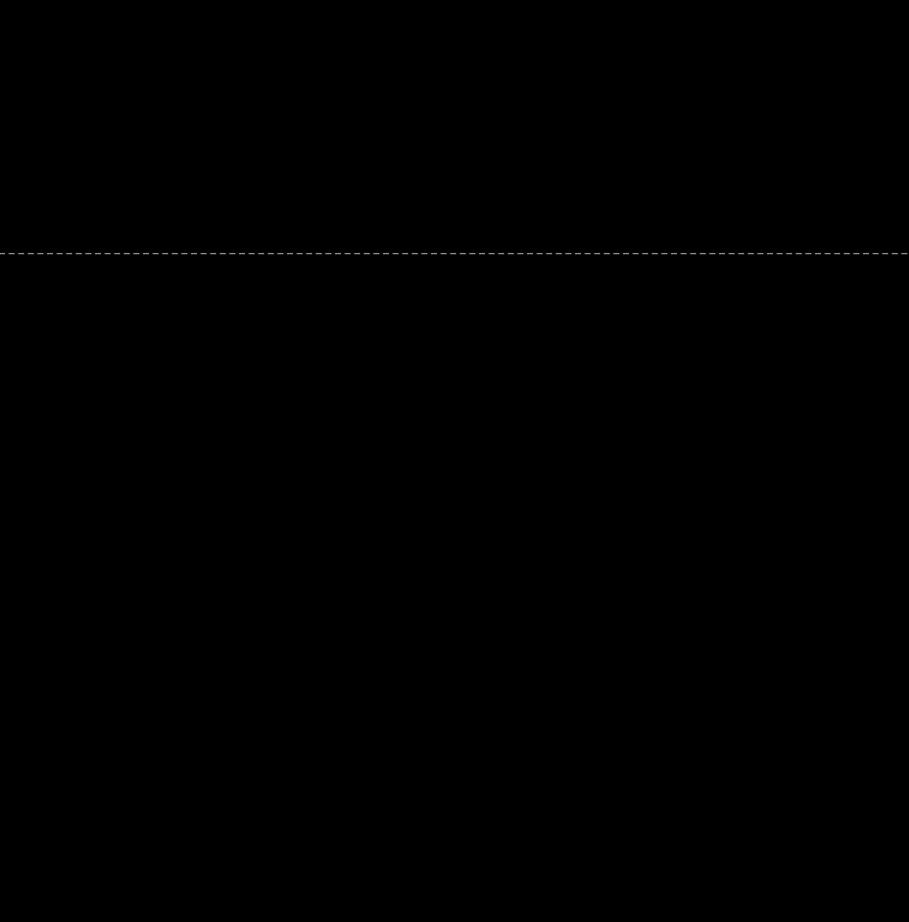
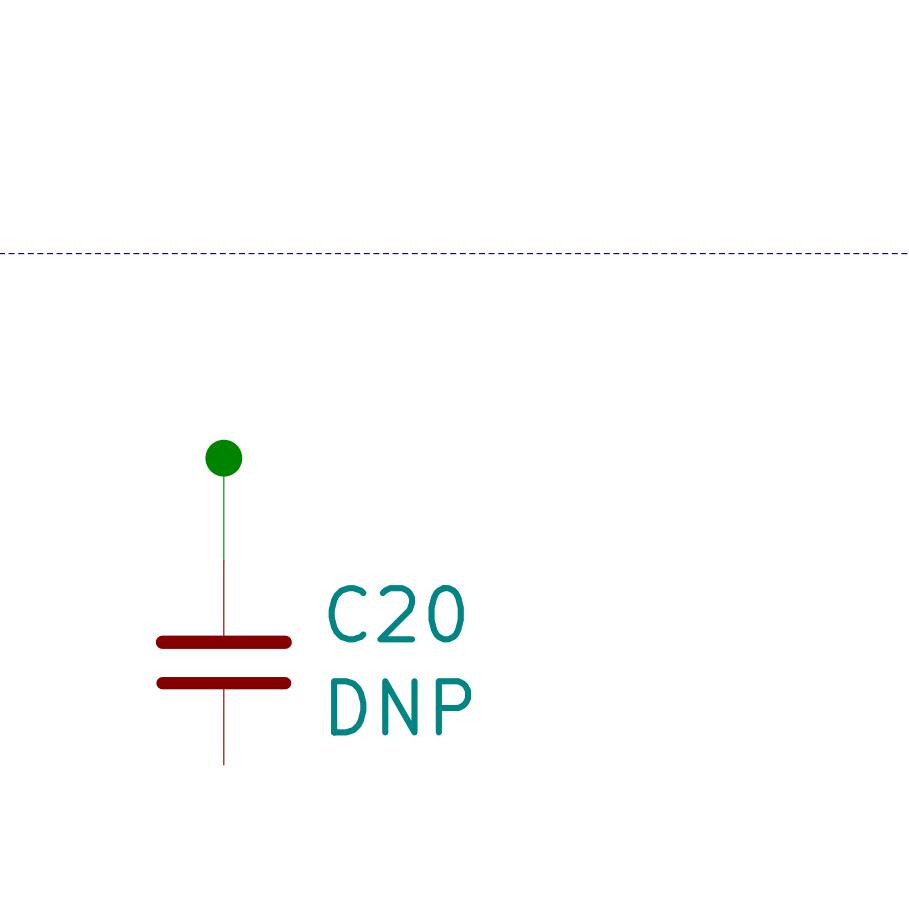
wire: none -> (223, 458) (223, 560)
junction: none -> (223, 458)
C20: none -> DNP (223, 662)

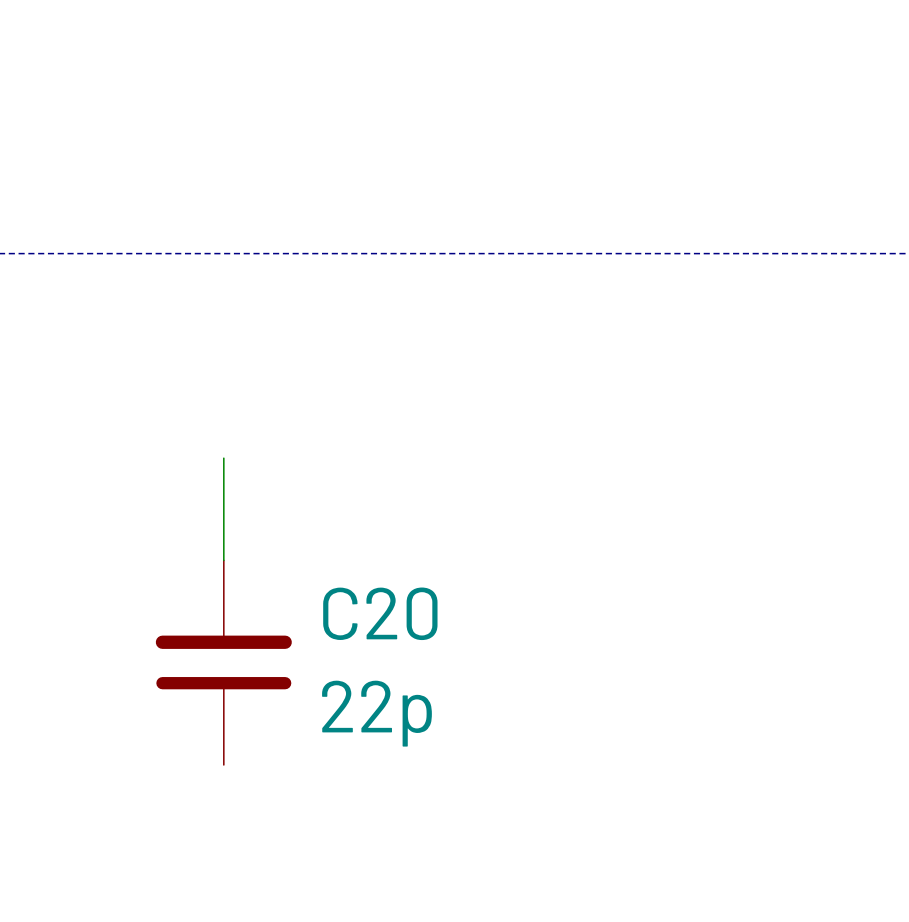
junction: (223, 458) -> none
C20 value: DNP (401, 706) -> 22p (376, 713)

